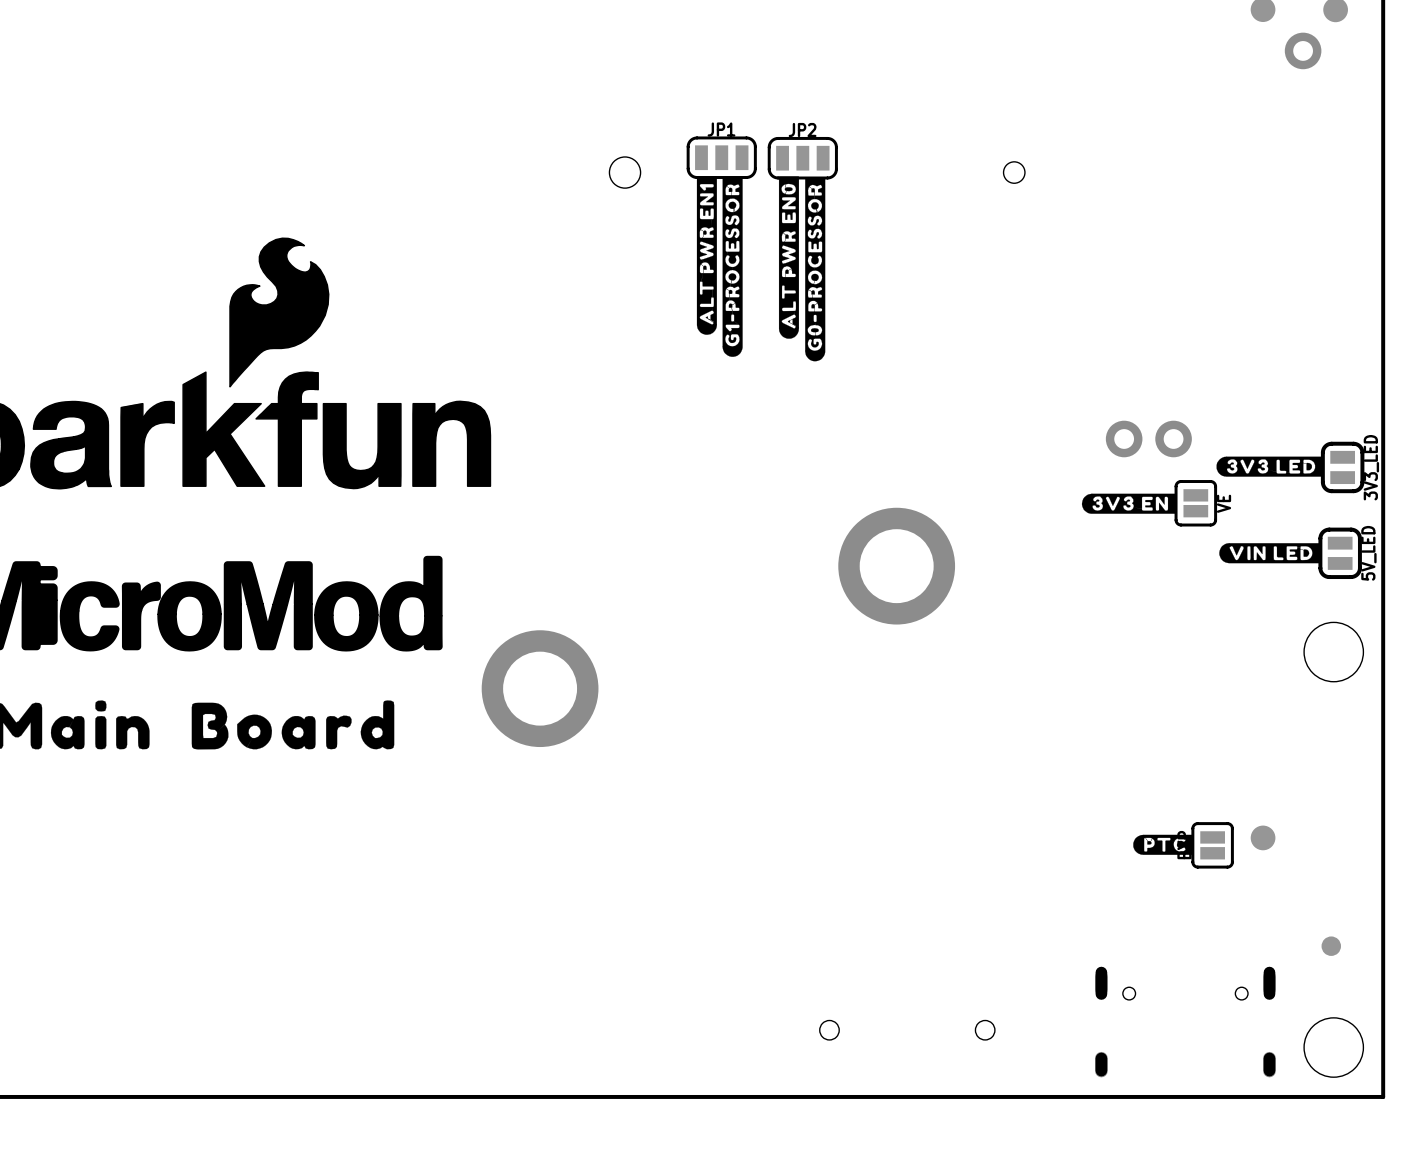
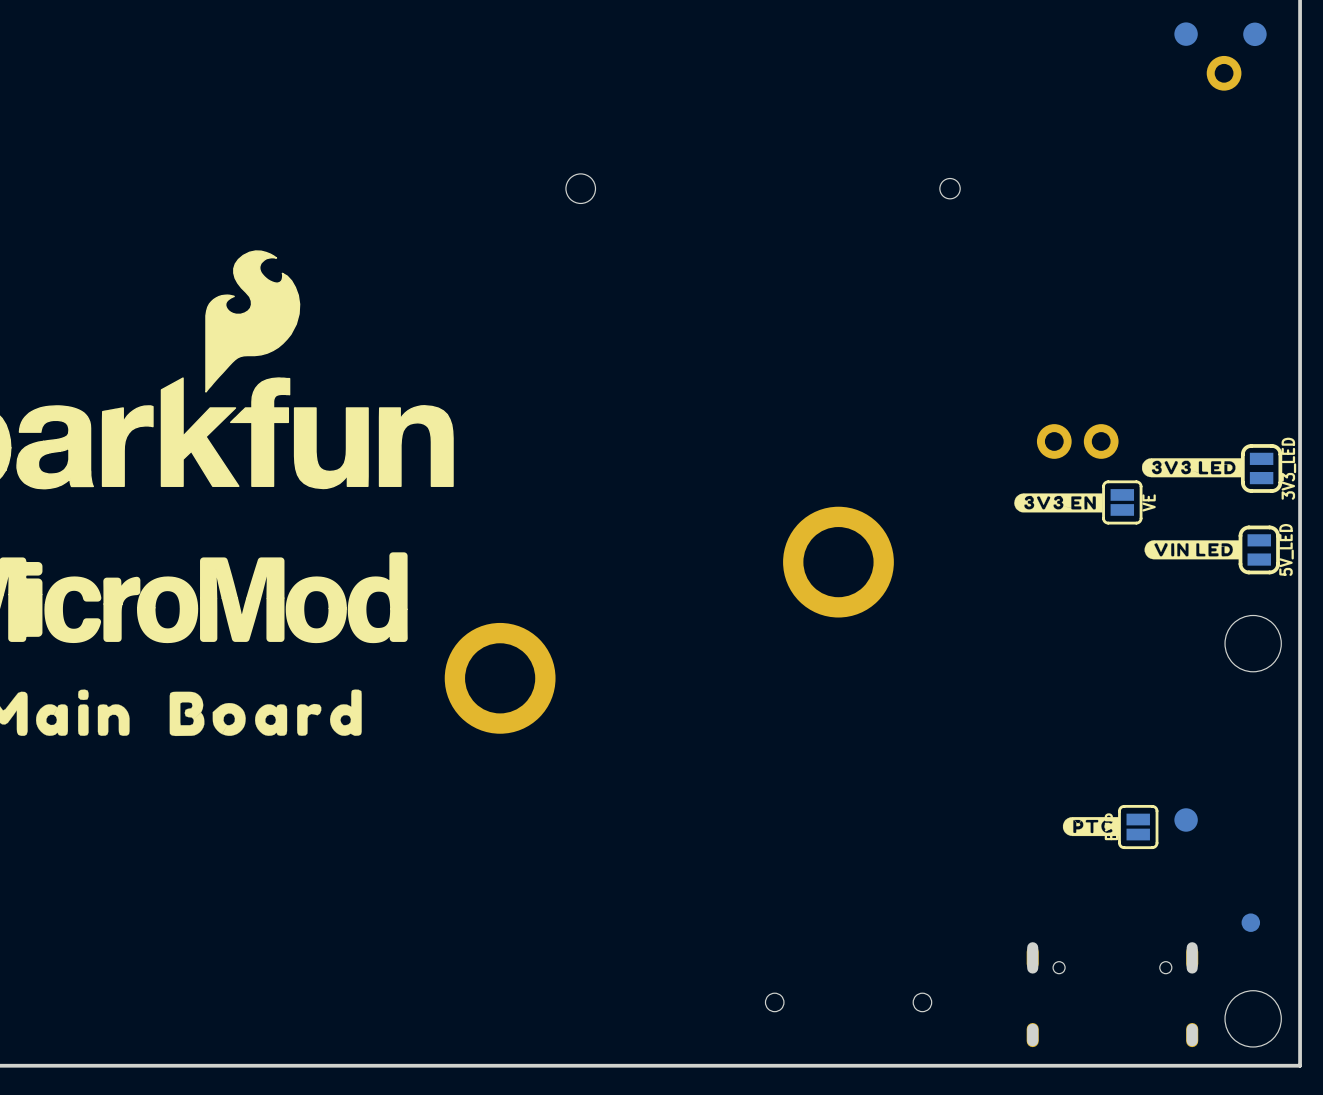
JP1: (721, 157) -> none
JP2: (802, 158) -> none
drawing: [696, 176, 743, 357] -> none
drawing: [778, 176, 826, 362] -> none

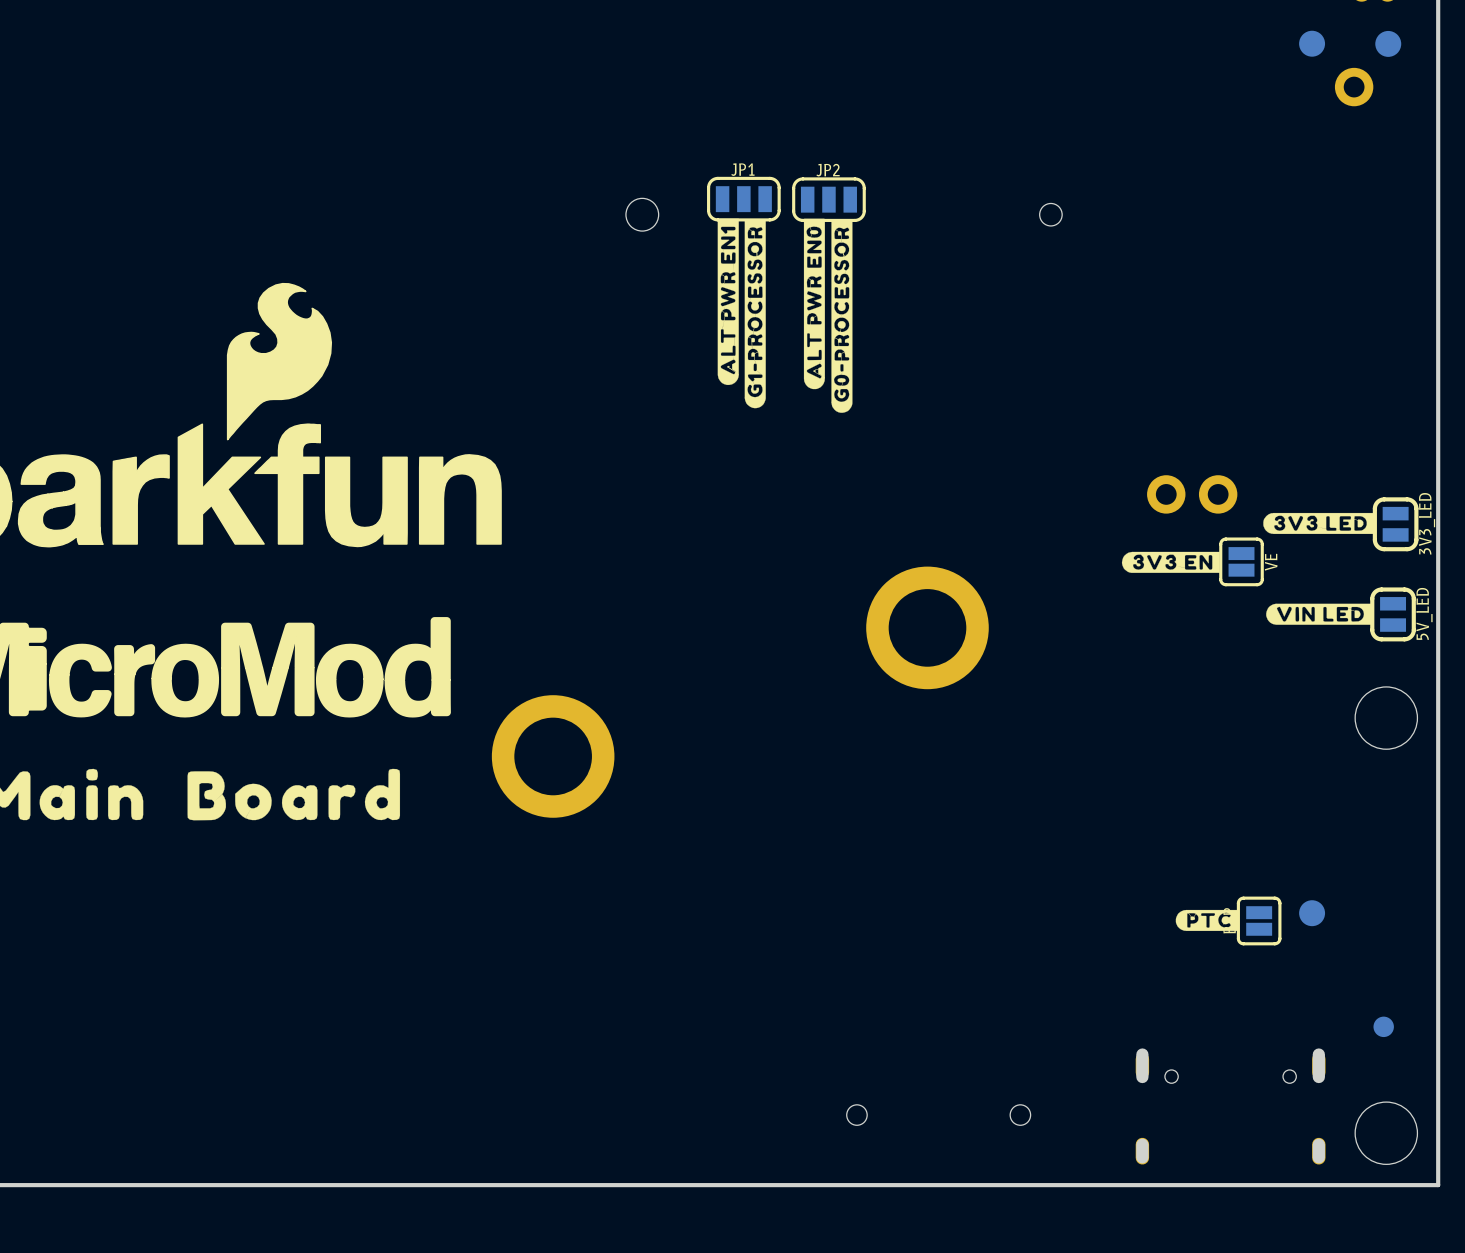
JP1: none -> (743, 199)
JP2: none -> (828, 199)
drawing: none -> [717, 218, 766, 409]
drawing: none -> [803, 218, 853, 413]

